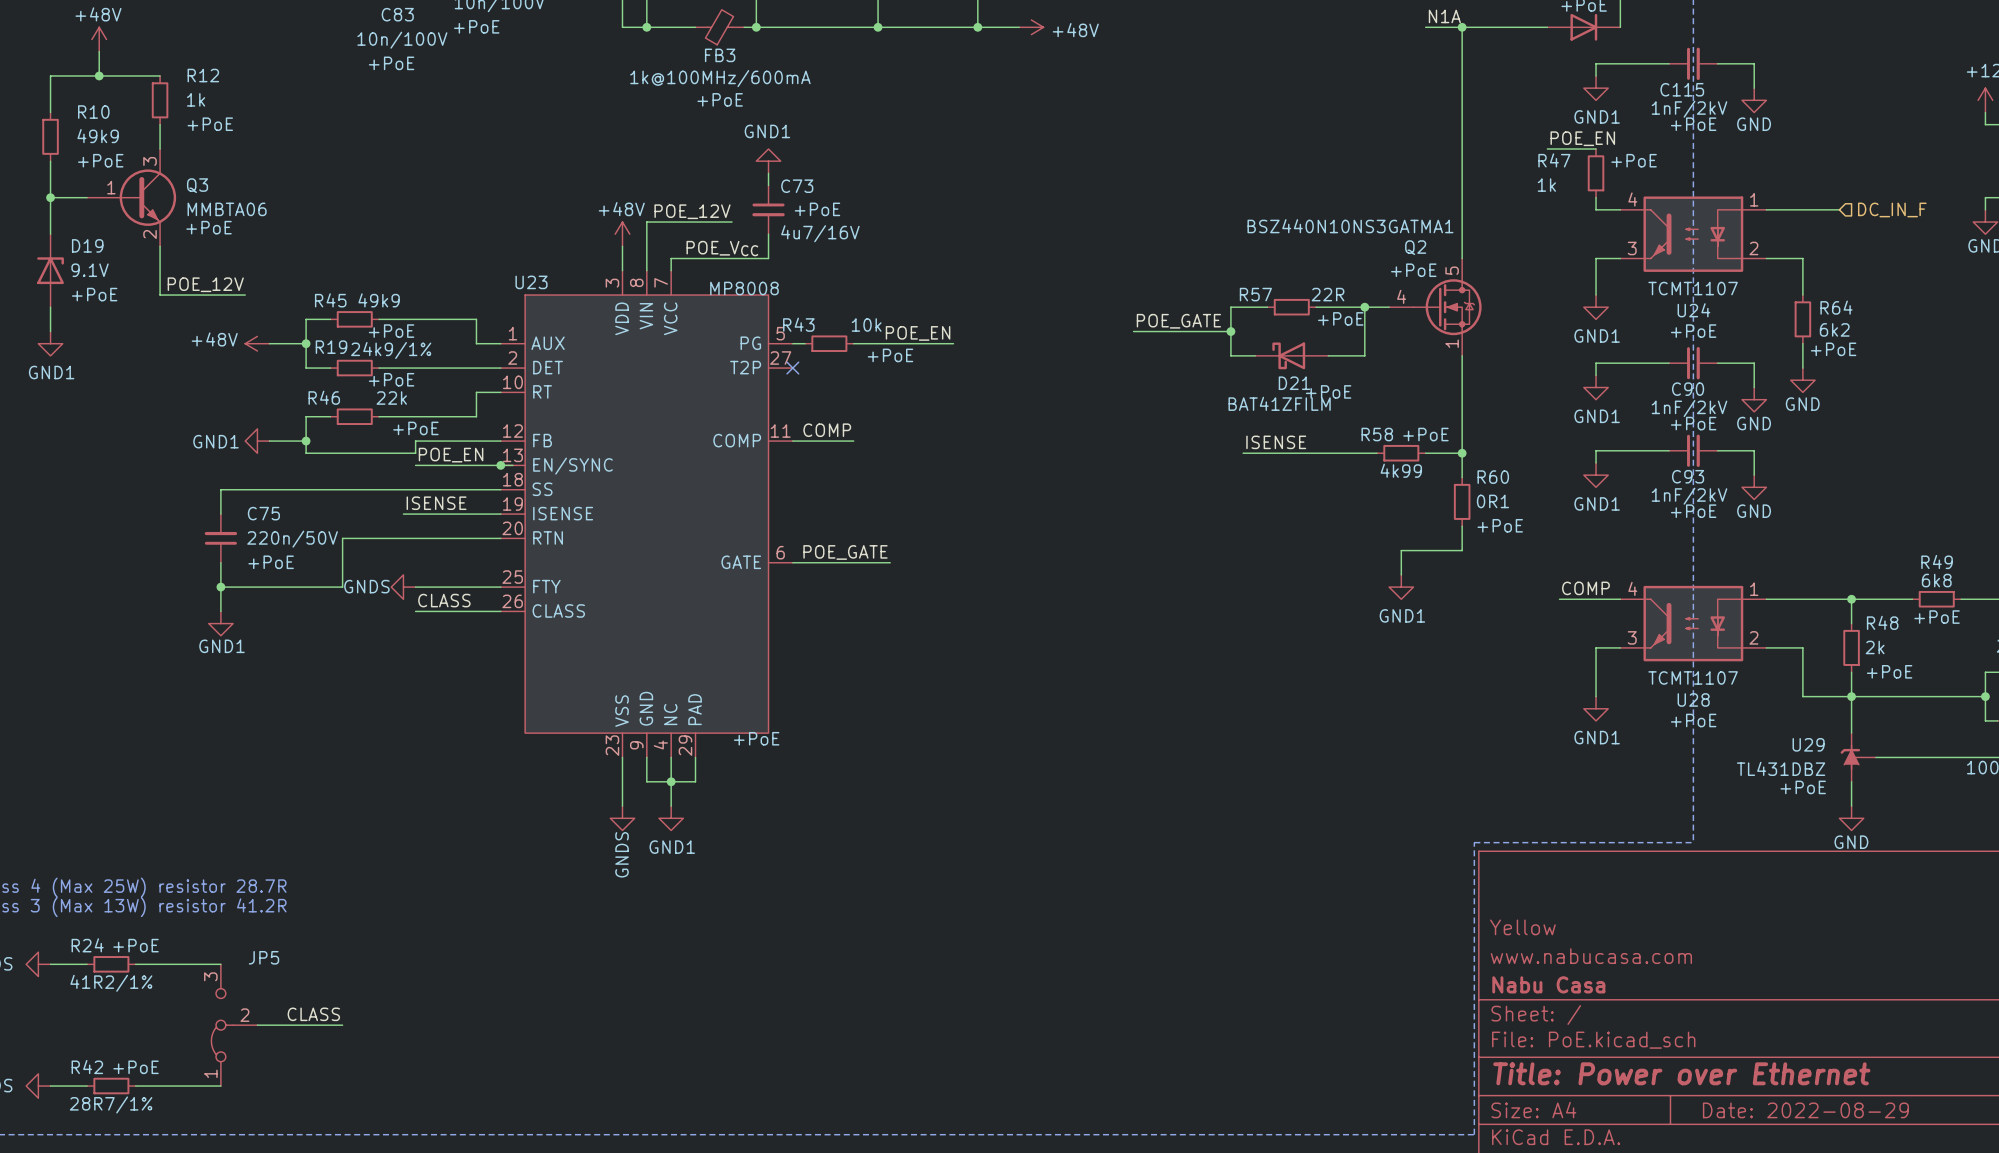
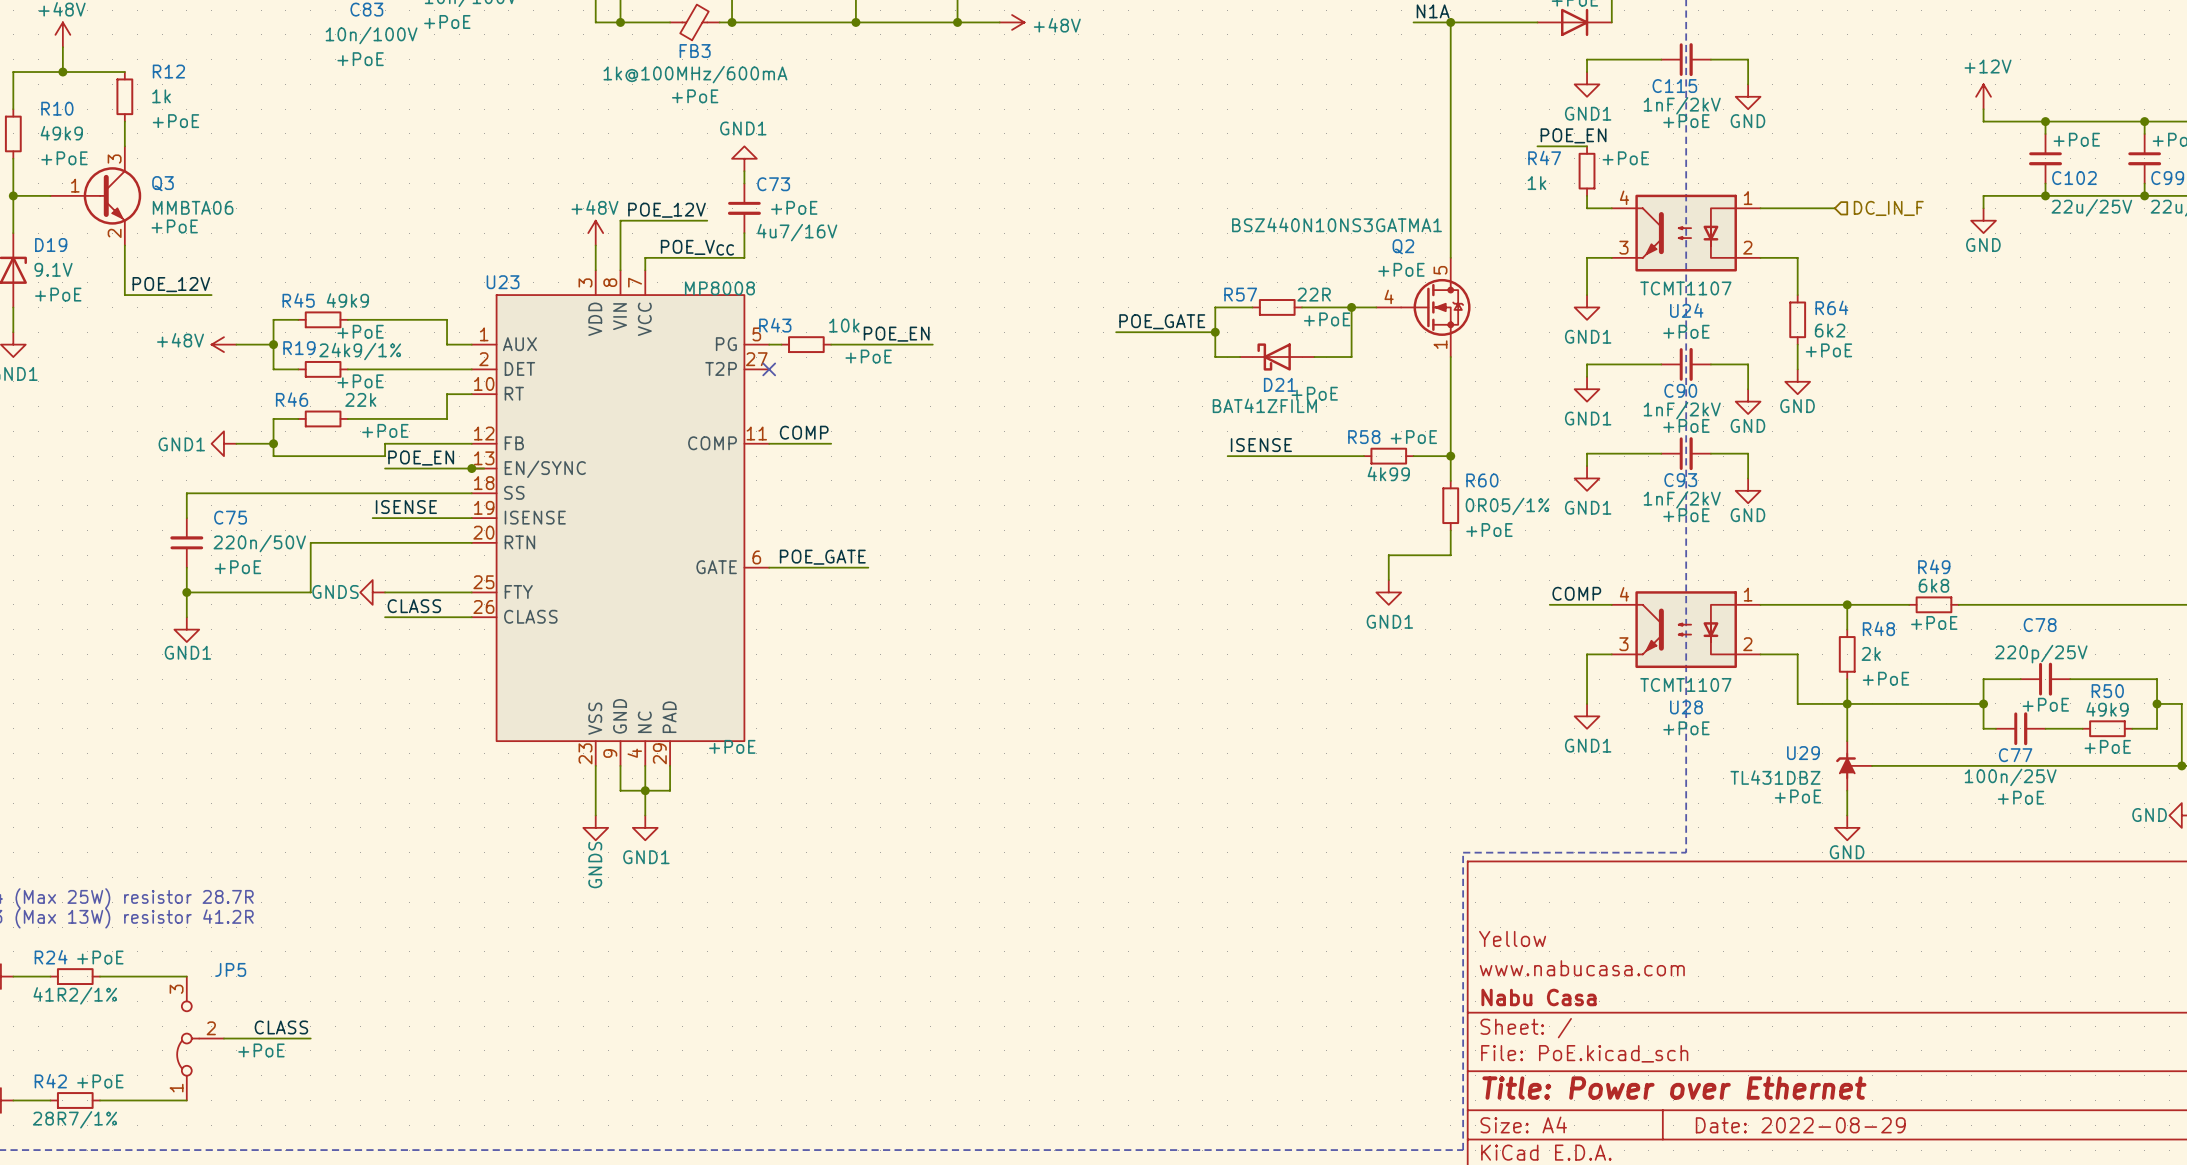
R60 value: 0R1 (1492, 501) -> 0R05/1% (1507, 506)
JP5 text: none -> +PoE (261, 1050)

